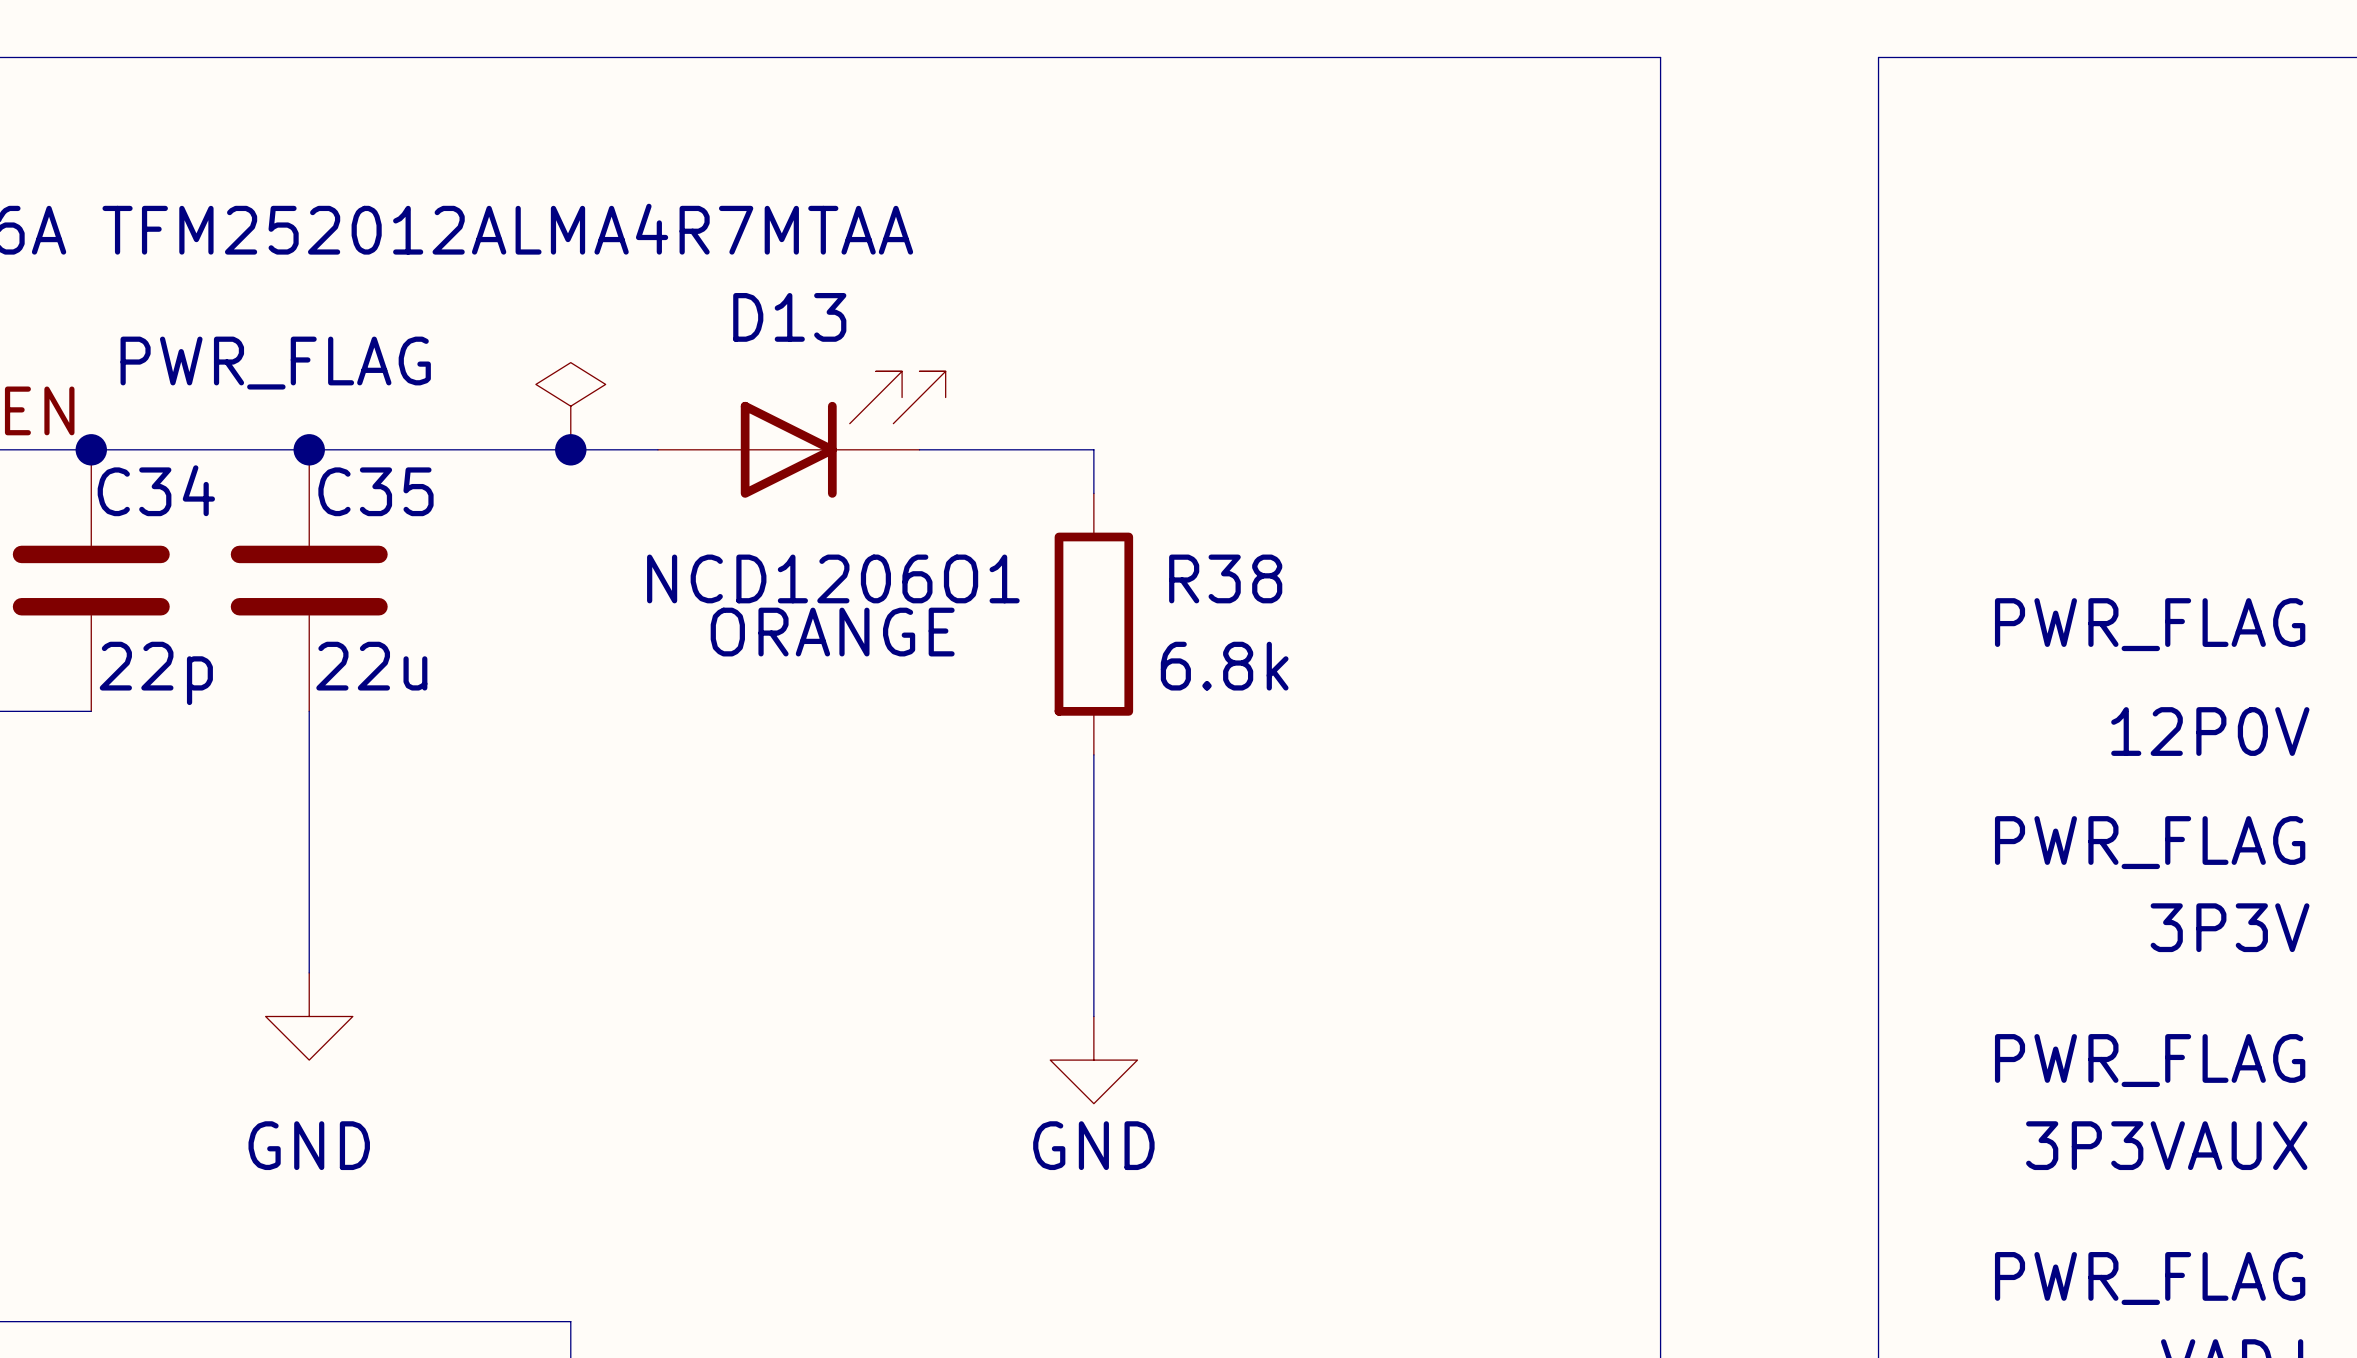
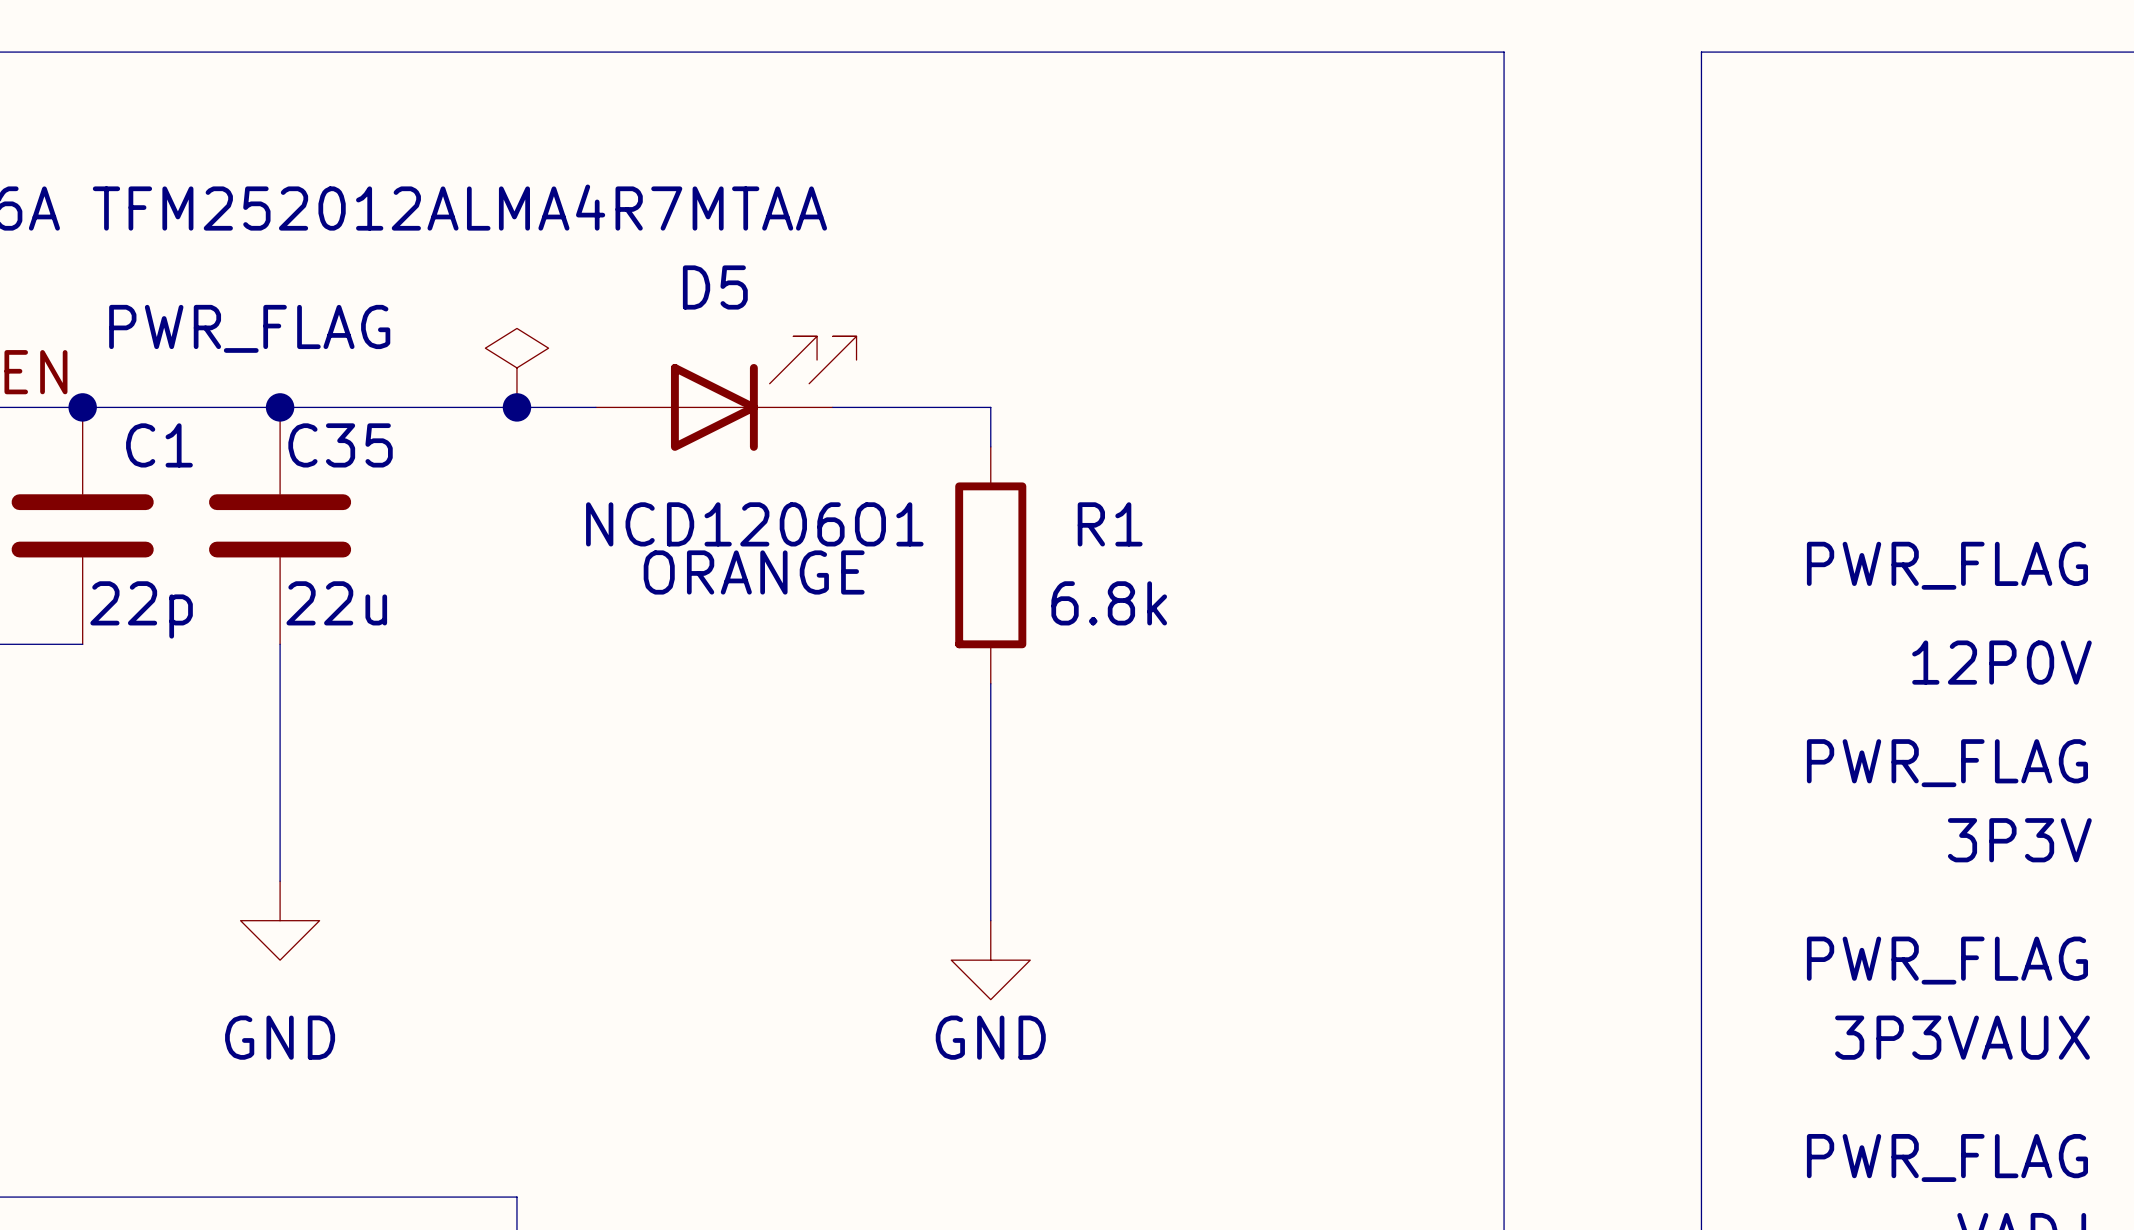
D13 name: D13 (789, 317) -> D5 (715, 287)
C34 name: C34 (156, 490) -> C1 (159, 445)
R38 name: R38 (1225, 578) -> R1 (1110, 524)

